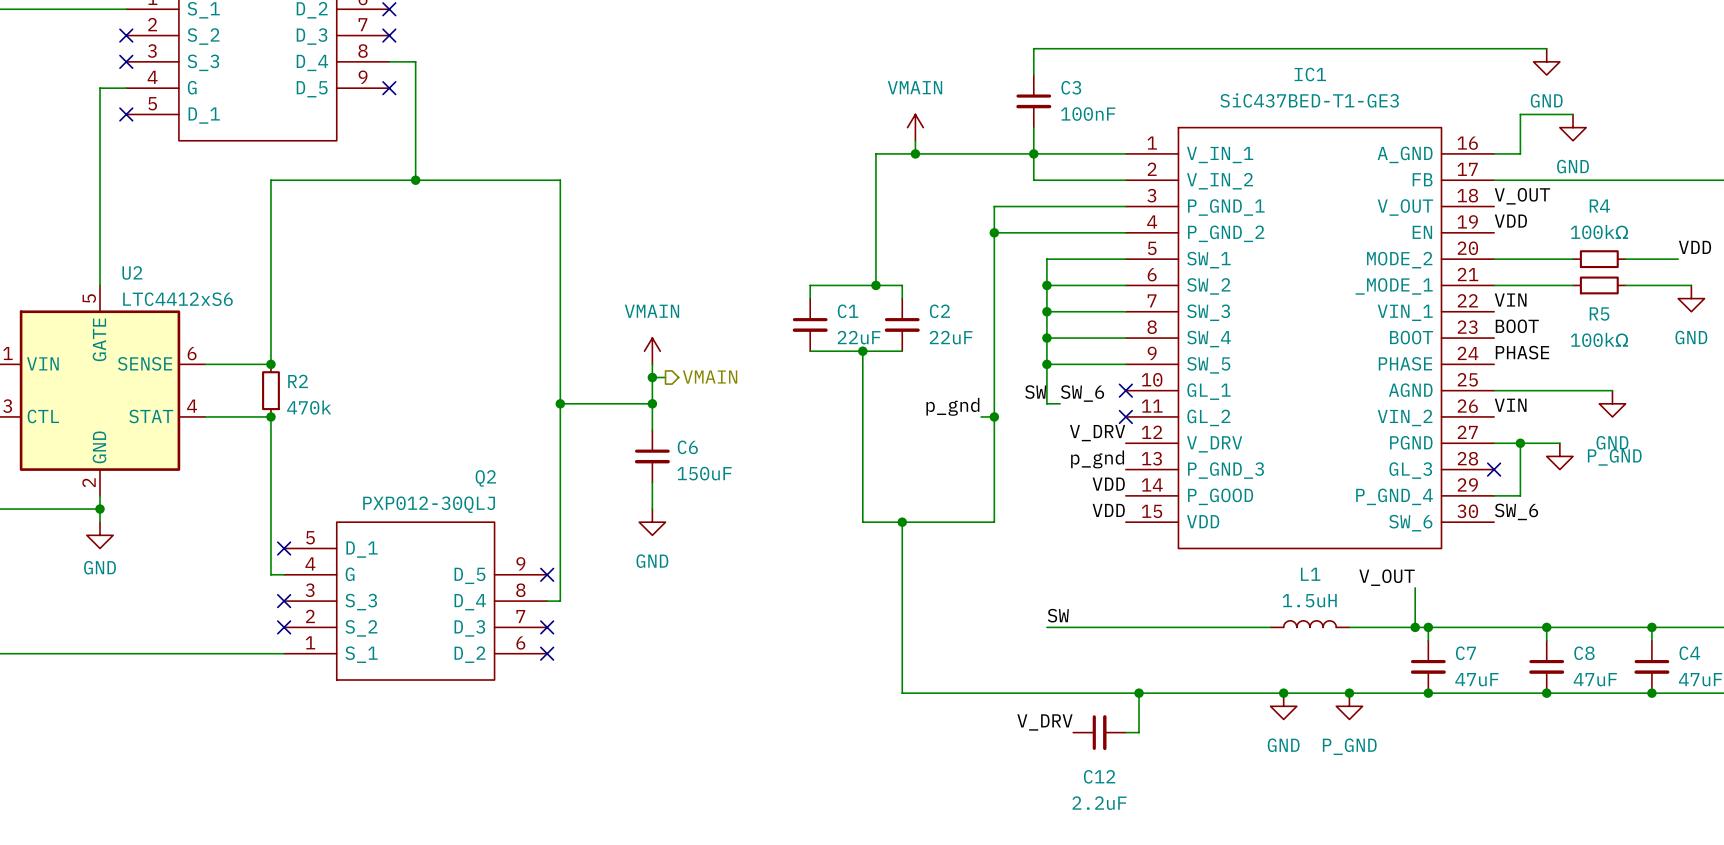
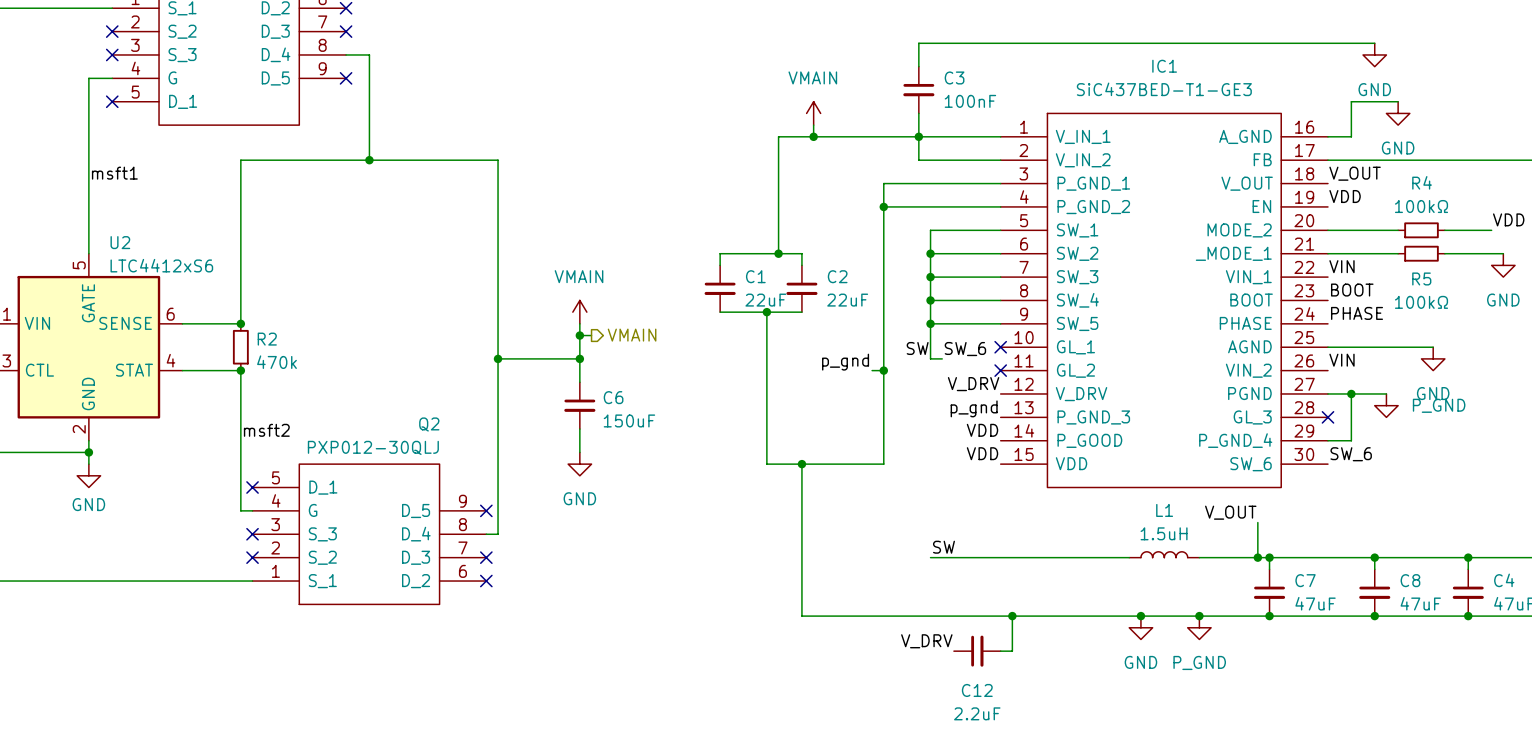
label: none -> msft1 (114, 173)
label: none -> msft2 (266, 430)

